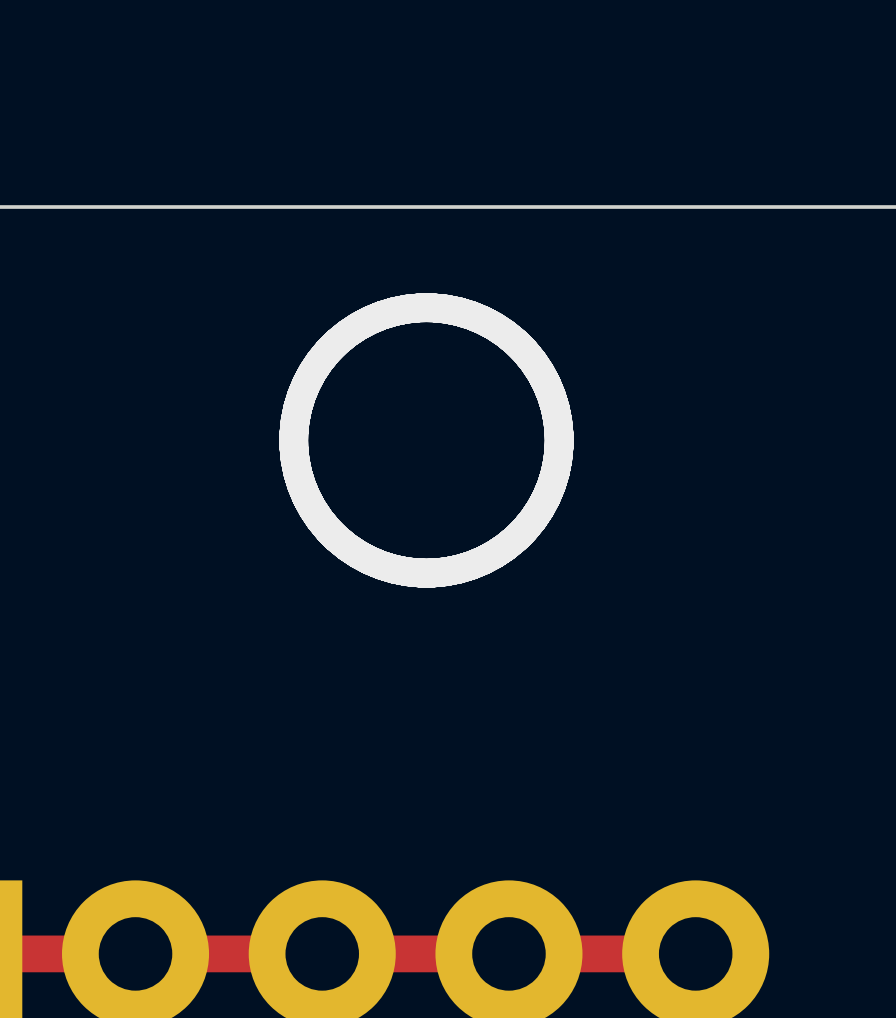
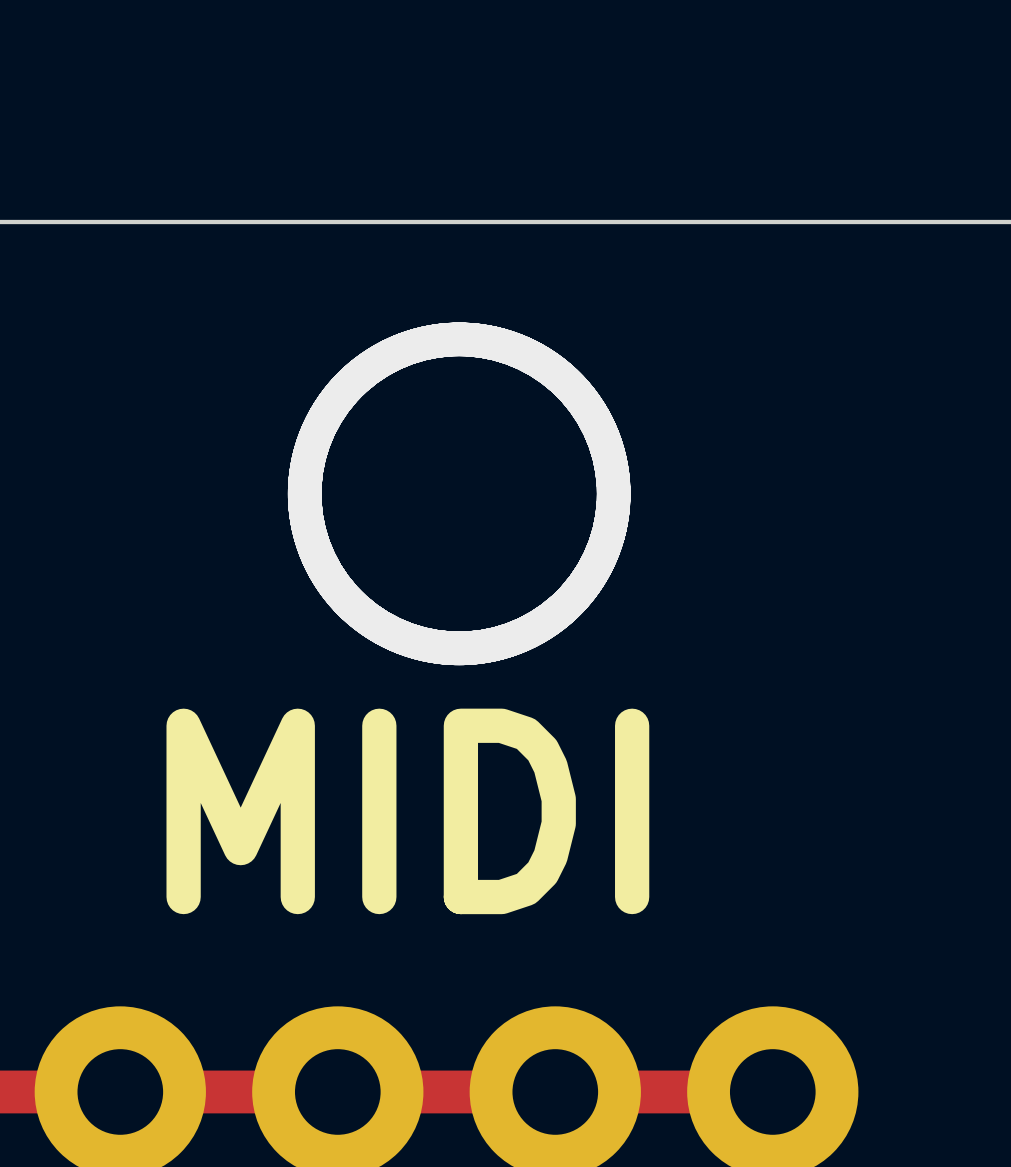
text: none -> MIDI (407, 811)

